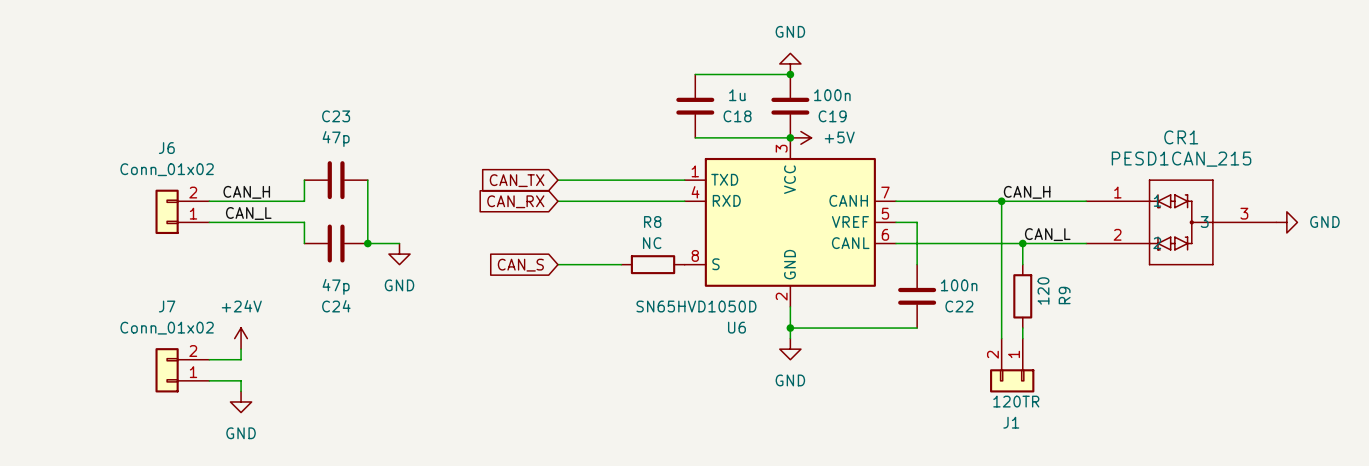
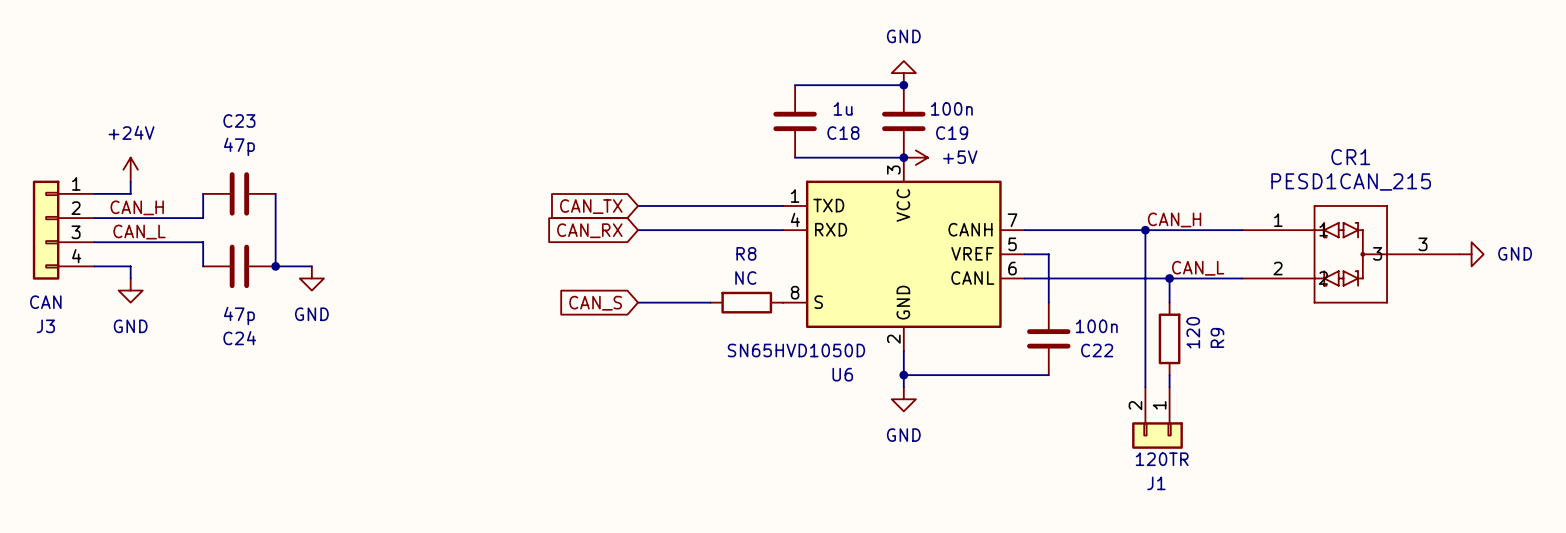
power symbol: none -> +24V (130, 169)
wire: none -> (130, 181) (130, 193) (94, 193)
wire: (304, 180) (304, 201) (209, 201) -> (203, 193) (203, 218) (94, 218)
C23 position: (336, 180) -> (239, 193)
wire: (367, 180) (367, 243) (399, 243) -> (275, 193) (275, 266) (311, 266)
label position: CAN_H (246, 192) -> CAN_H (137, 207)
J3: none -> CAN (63, 230)
J6: Conn_01x02 (182, 211) -> none
label position: CAN_L (248, 213) -> CAN_L (139, 232)
wire: (209, 222) (304, 222) (304, 243) -> (94, 242) (203, 242) (203, 266)
junction: none -> (275, 266)
power symbol: none -> GND (311, 278)
C24 position: (336, 243) -> (239, 266)
junction: (367, 243) -> none
power symbol: none -> GND (130, 290)
power symbol: GND (399, 254) -> none
power symbol: +24V (241, 338) -> none
wire: (241, 349) (241, 359) (209, 359) -> none
J7: Conn_01x02 (182, 370) -> none
wire: (209, 380) (241, 380) (241, 391) -> (94, 266) (130, 266) (130, 278)
power symbol: GND (241, 401) -> none

